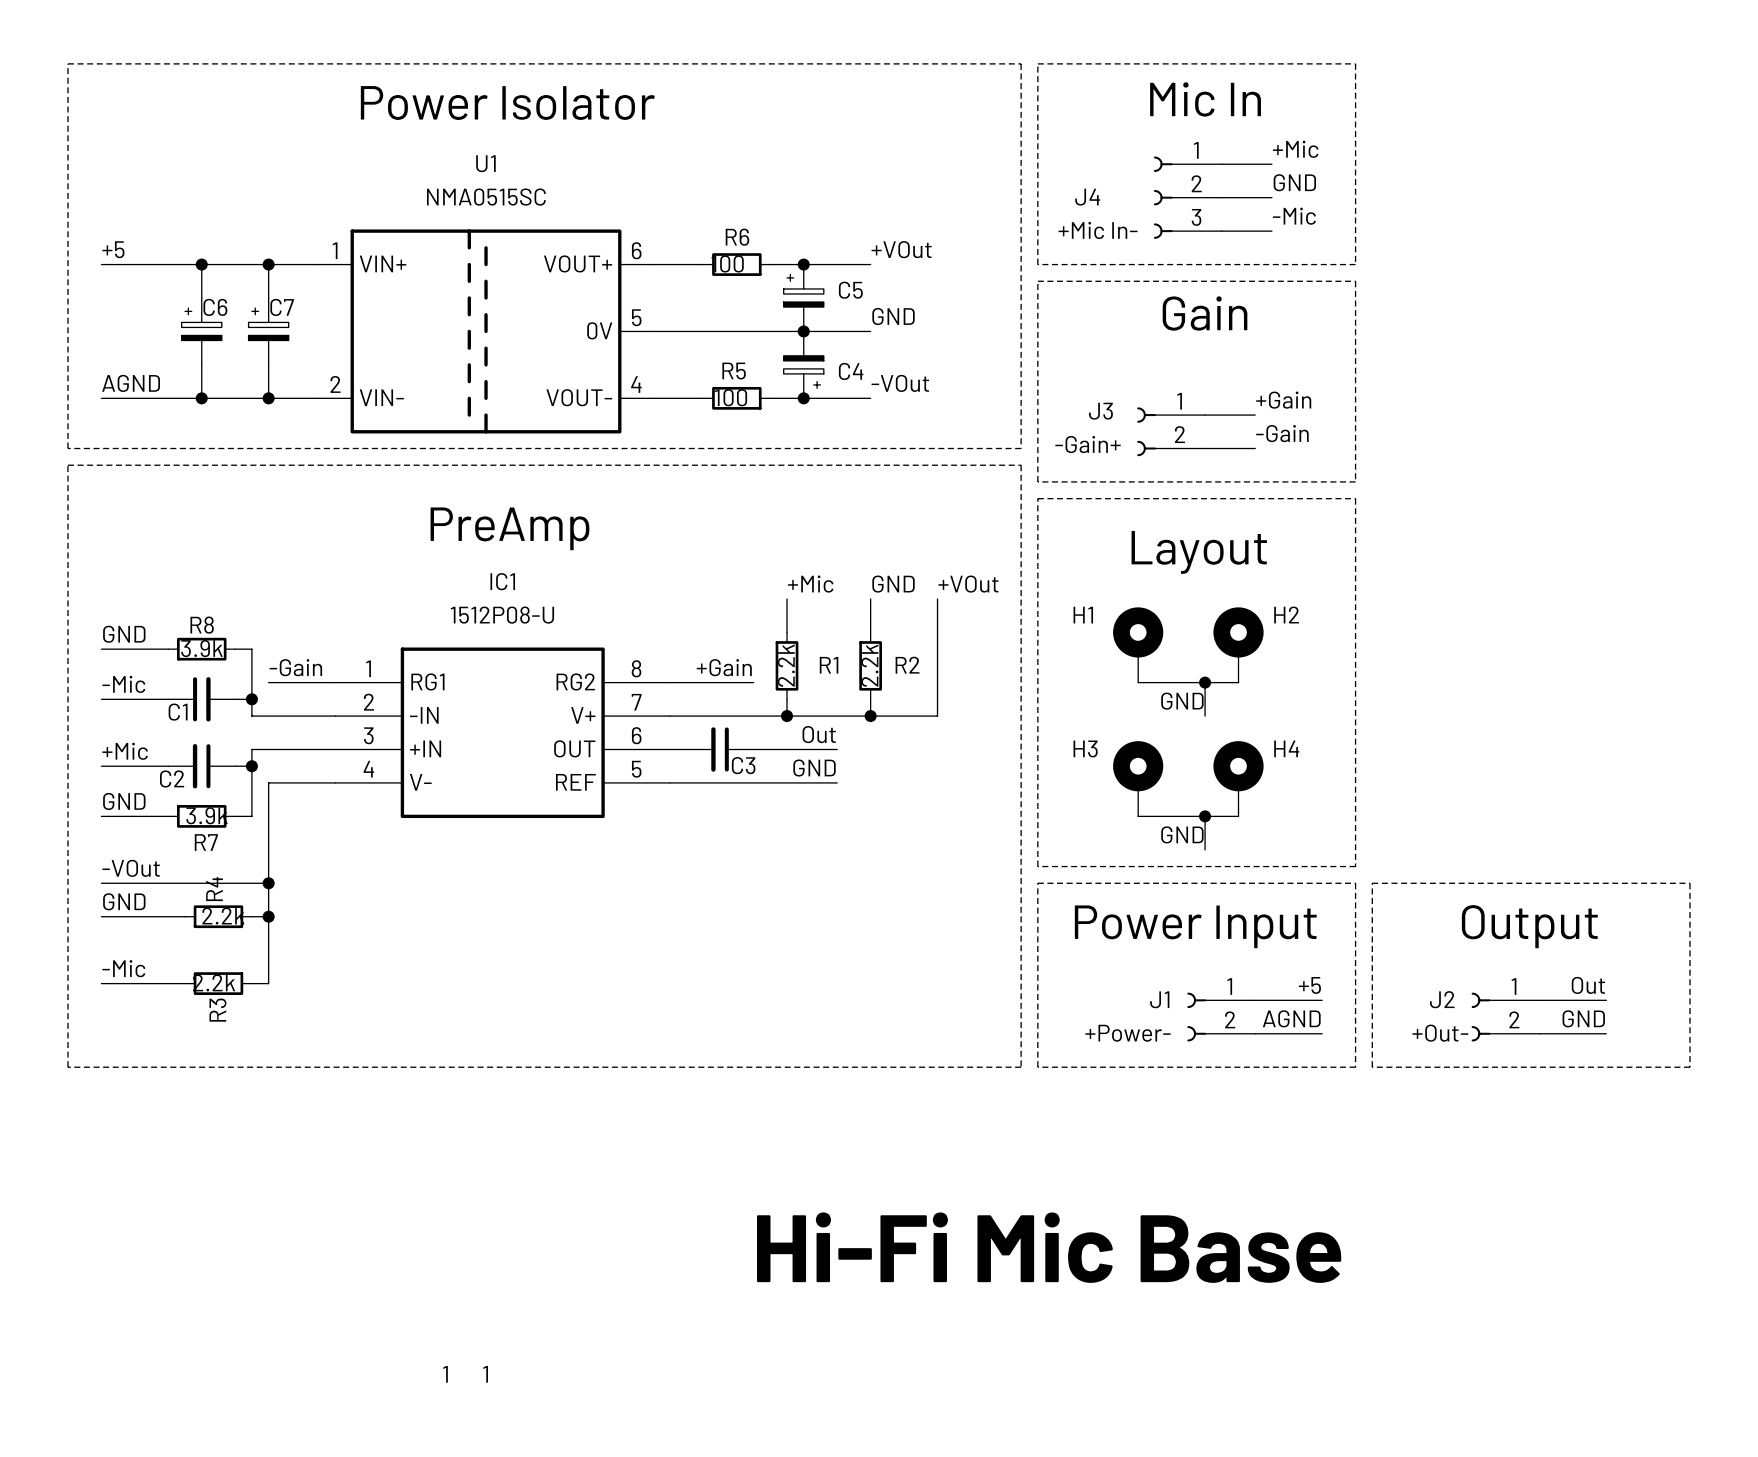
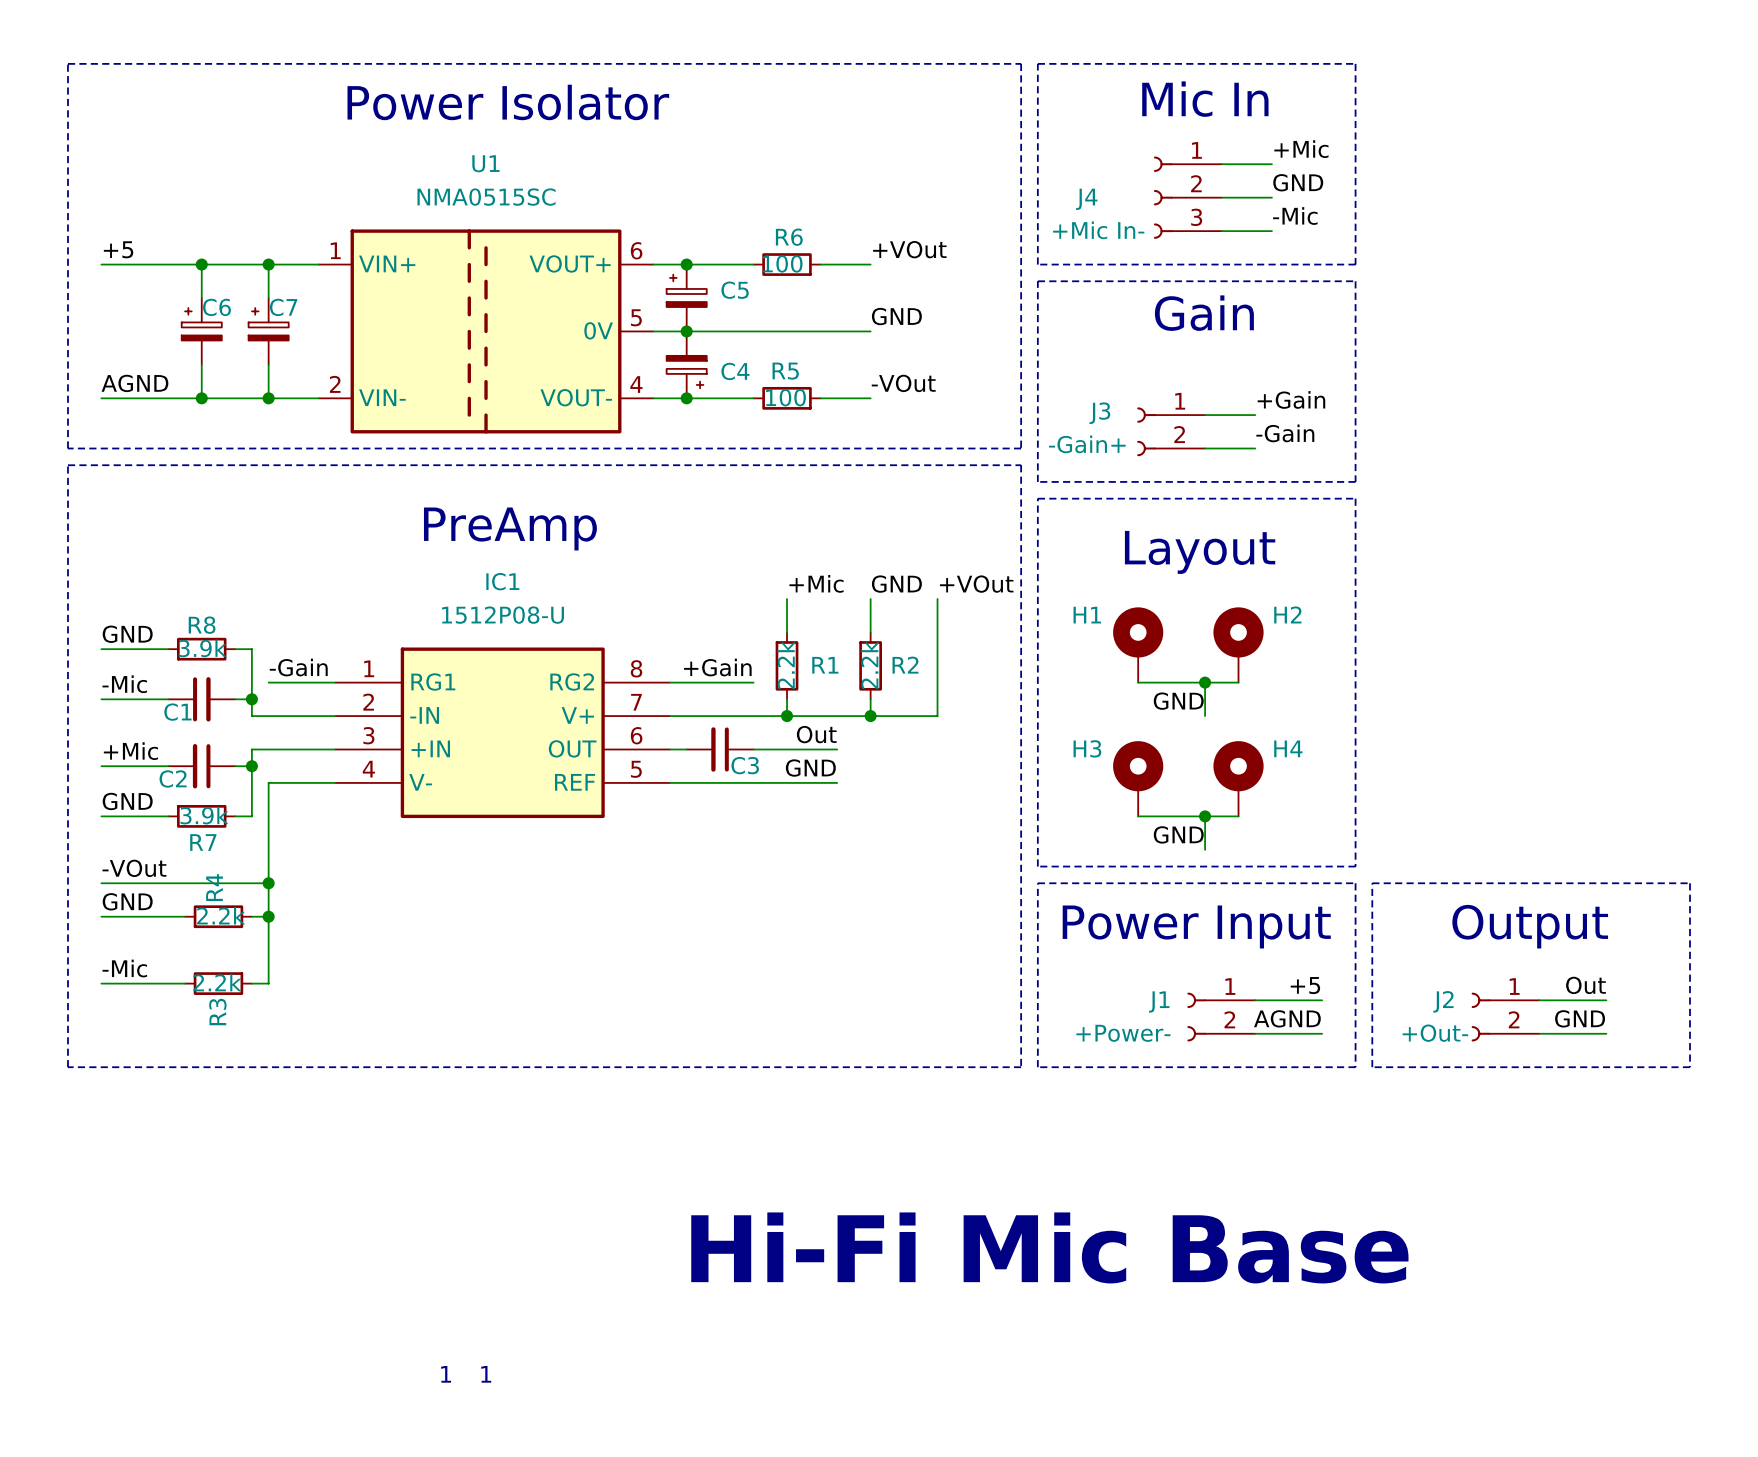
junction: none -> (686, 264)
R6 position: (736, 264) -> (787, 264)
wire: (770, 264) (820, 264) -> (703, 264) (753, 264)
junction: (803, 264) -> none
C5 position: (803, 298) -> (686, 298)
junction: none -> (686, 331)
junction: (803, 331) -> none
C4 position: (803, 364) -> (686, 364)
junction: none -> (686, 398)
R5 position: (736, 398) -> (787, 398)
wire: (770, 398) (820, 398) -> (703, 398) (753, 398)
junction: (803, 398) -> none

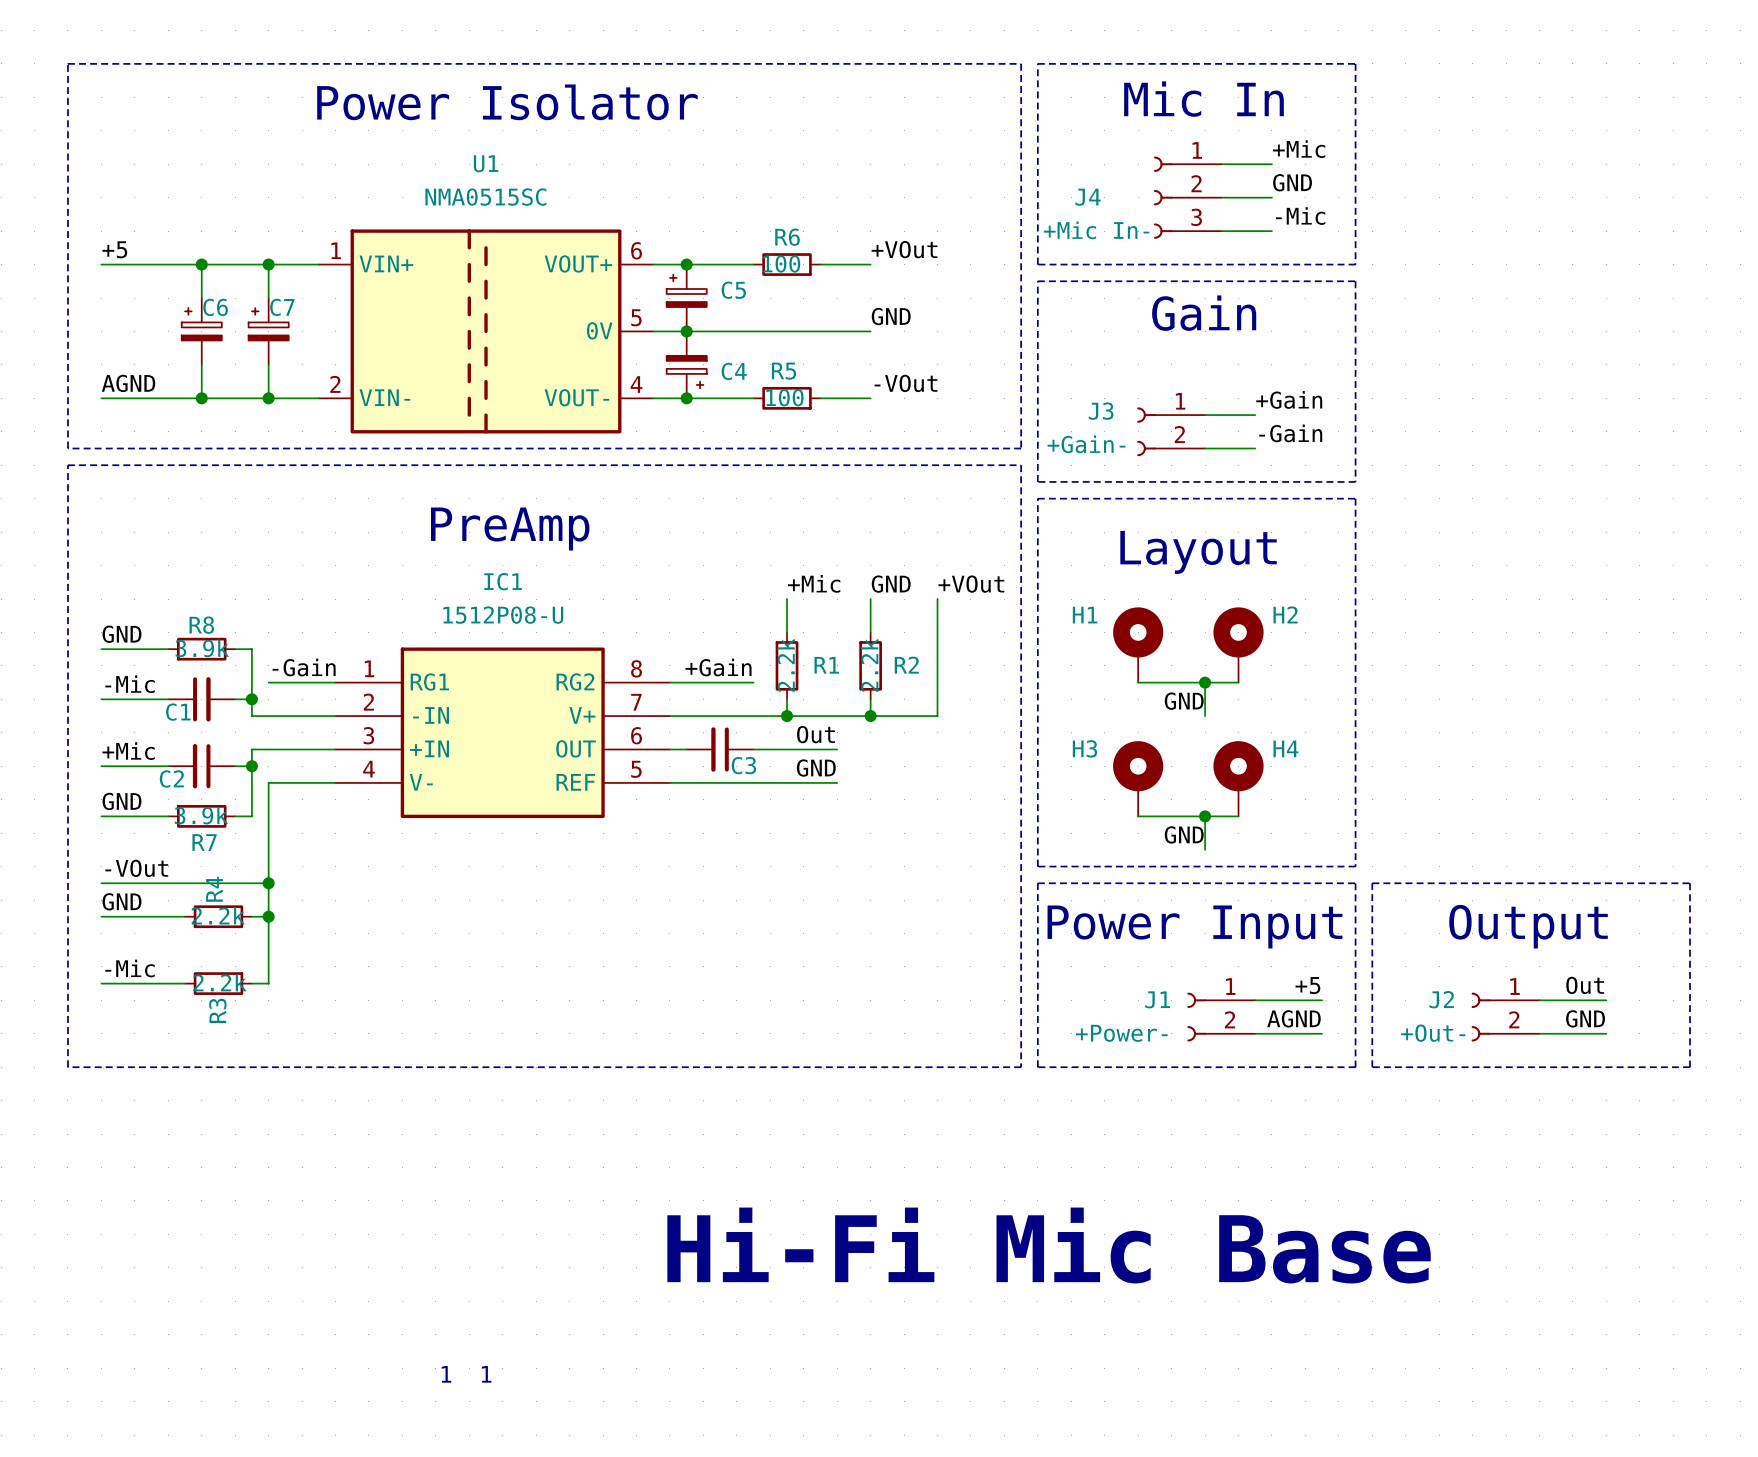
J3 value: -Gain+ (1087, 444) -> +Gain- (1086, 444)

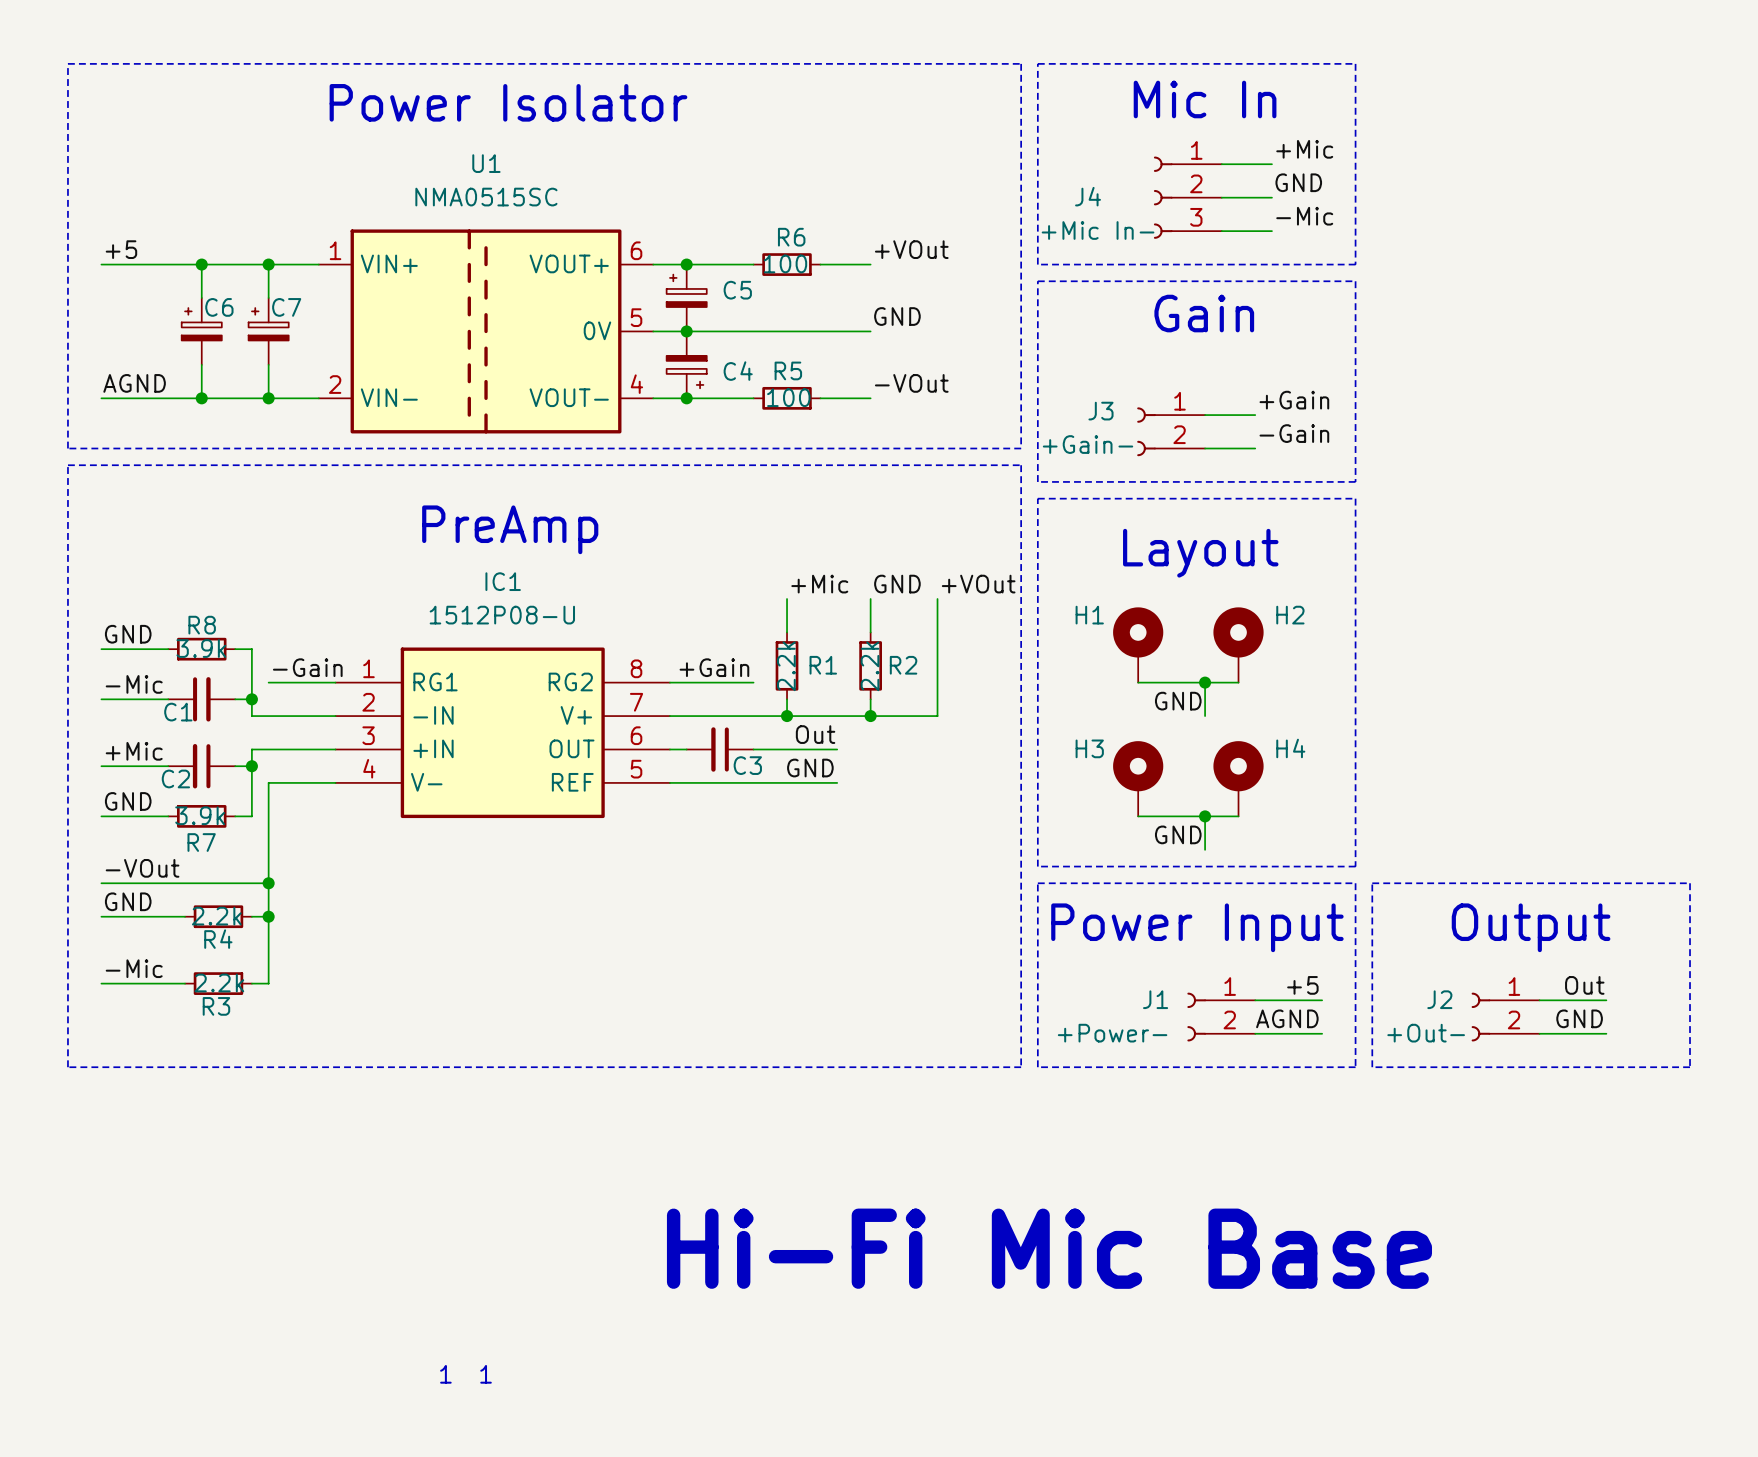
R4 name rotation: 0° (214, 889) -> 90° clockwise (218, 939)
R4 name position: R4 (214, 889) -> R4 (218, 939)
R3 name rotation: 0° (217, 1010) -> 90° clockwise (216, 1006)

